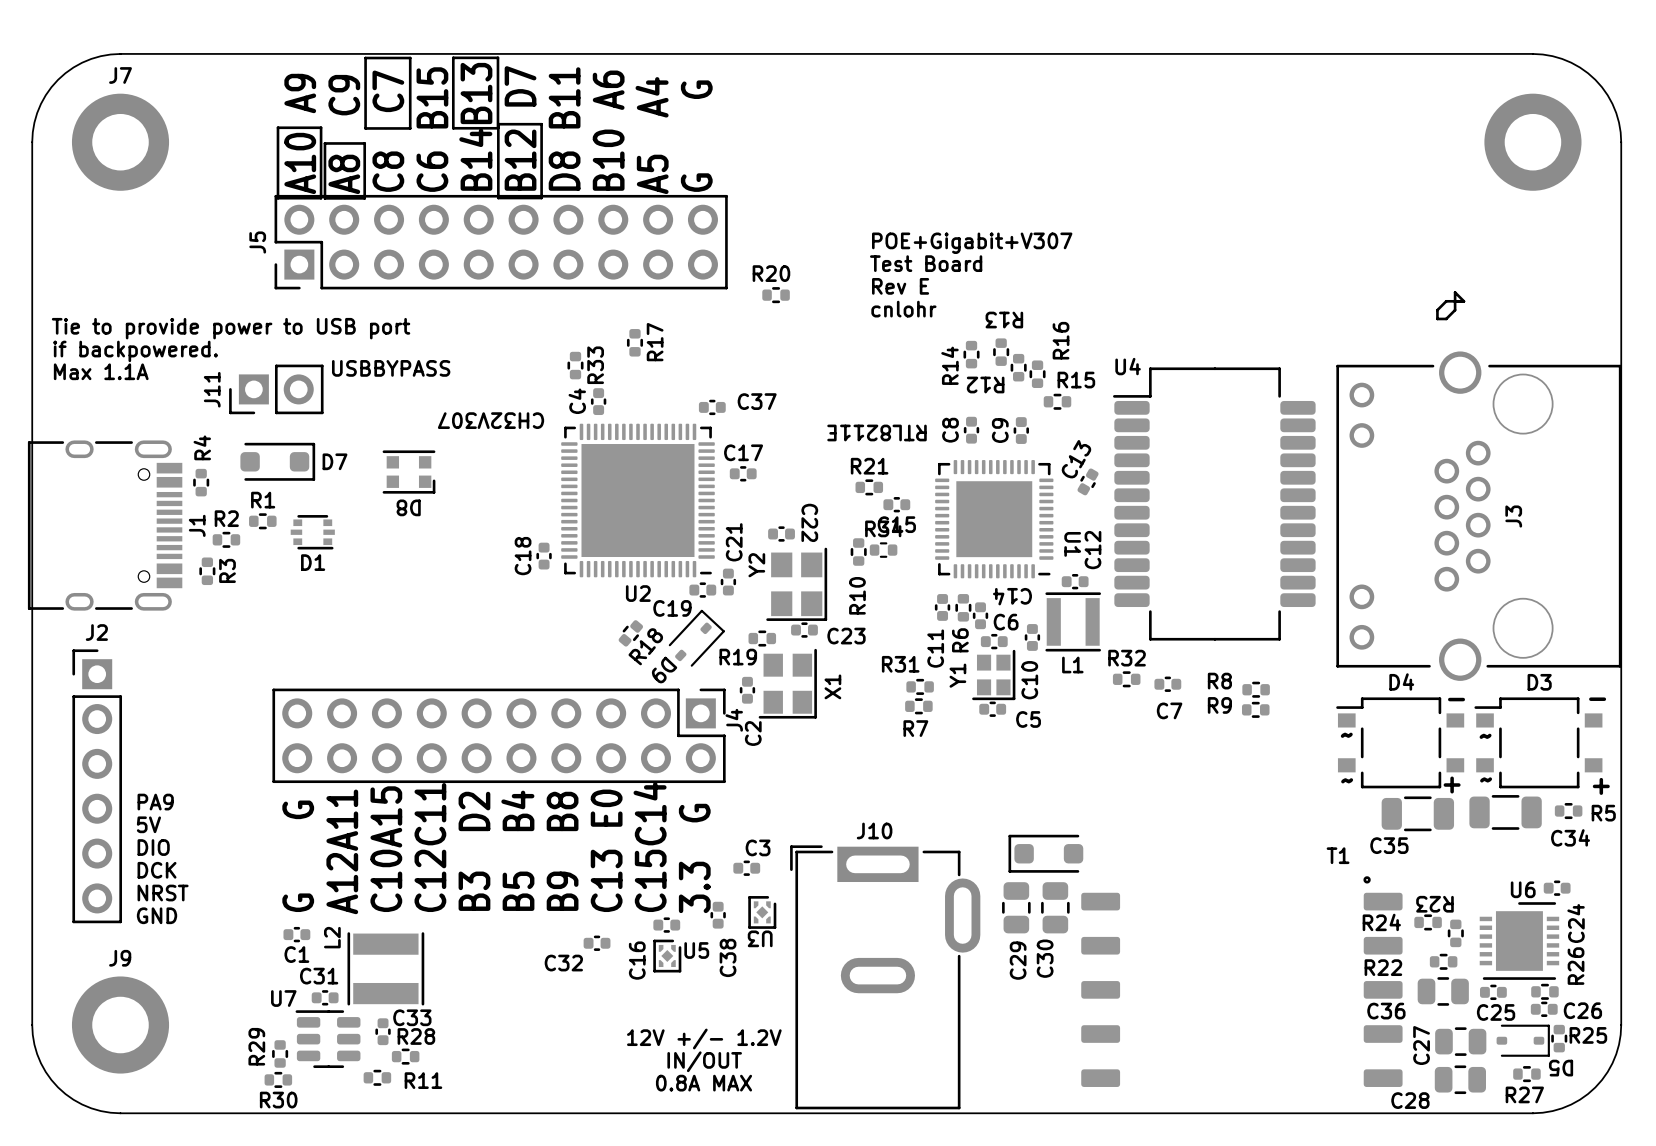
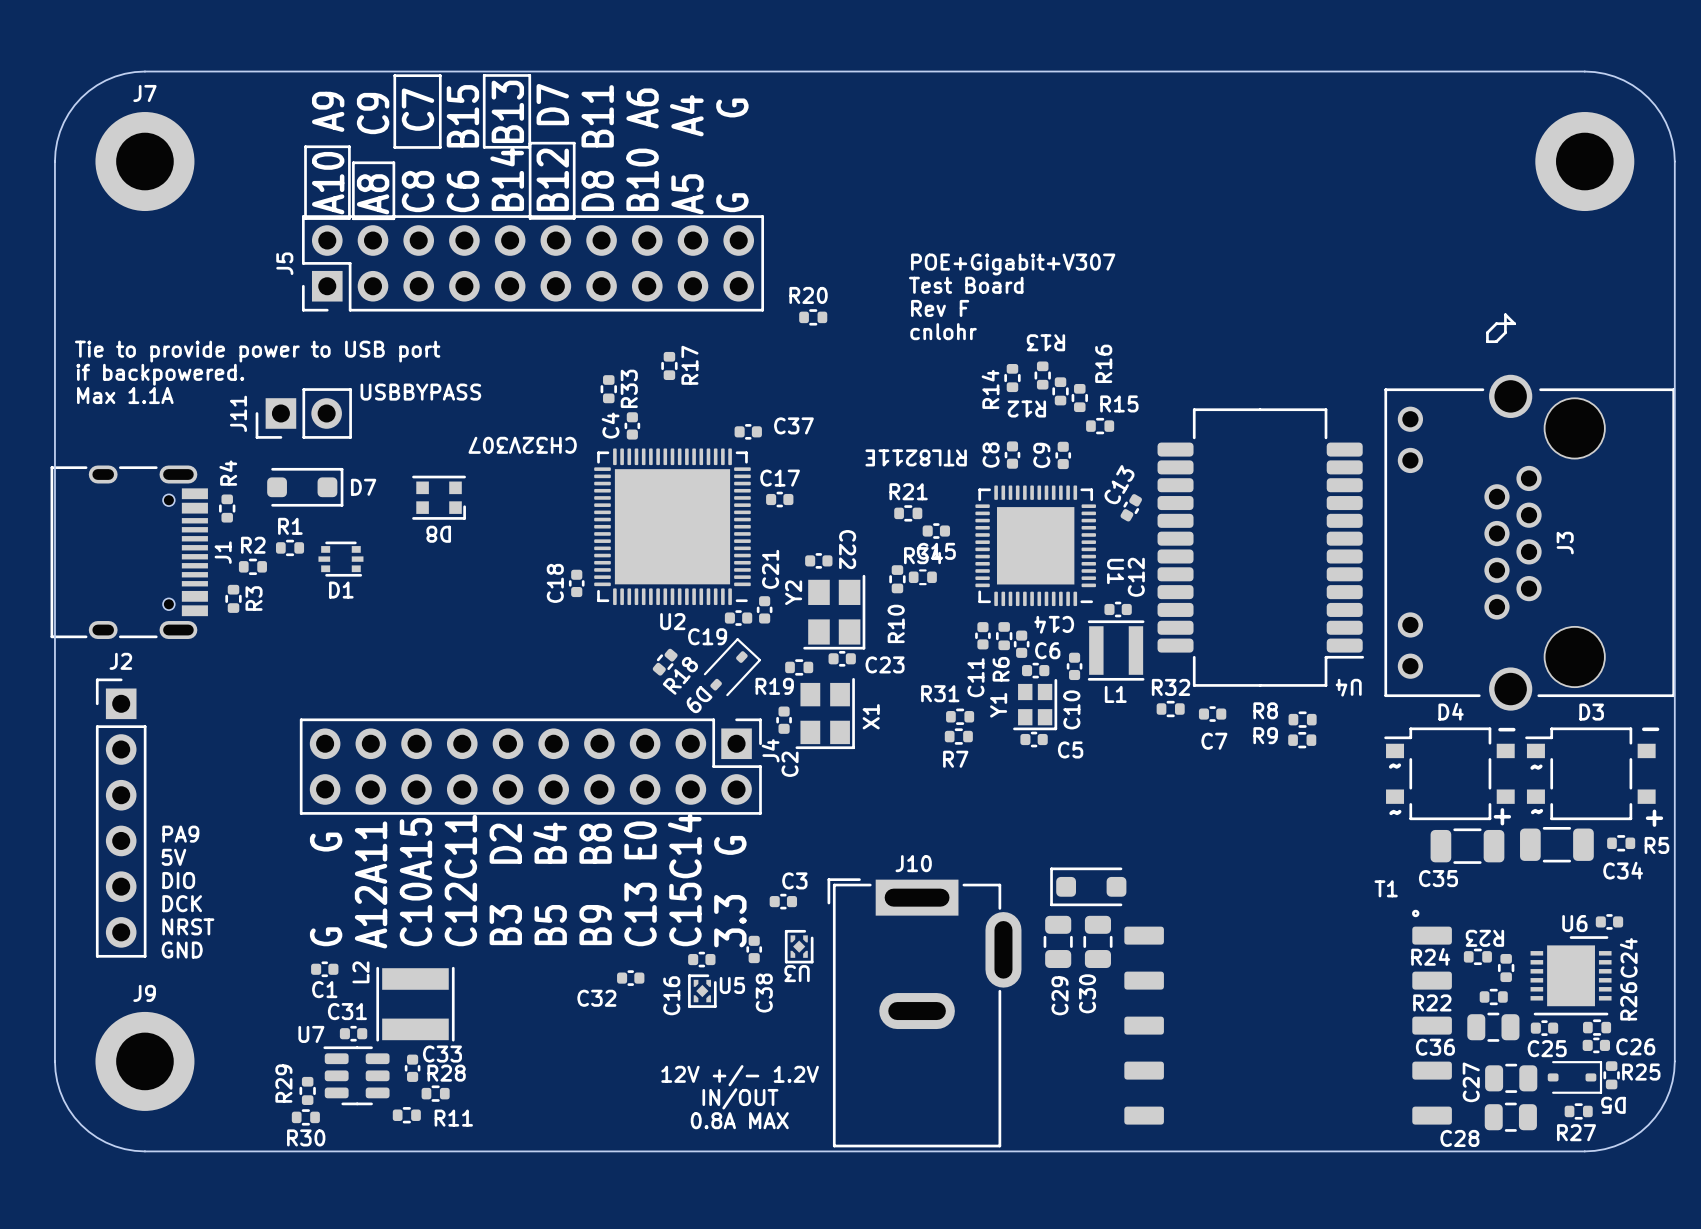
text: Rev E (900, 286) -> Rev F (940, 308)
U4 rotation: 0° (1214, 503) -> 180° (1260, 547)

